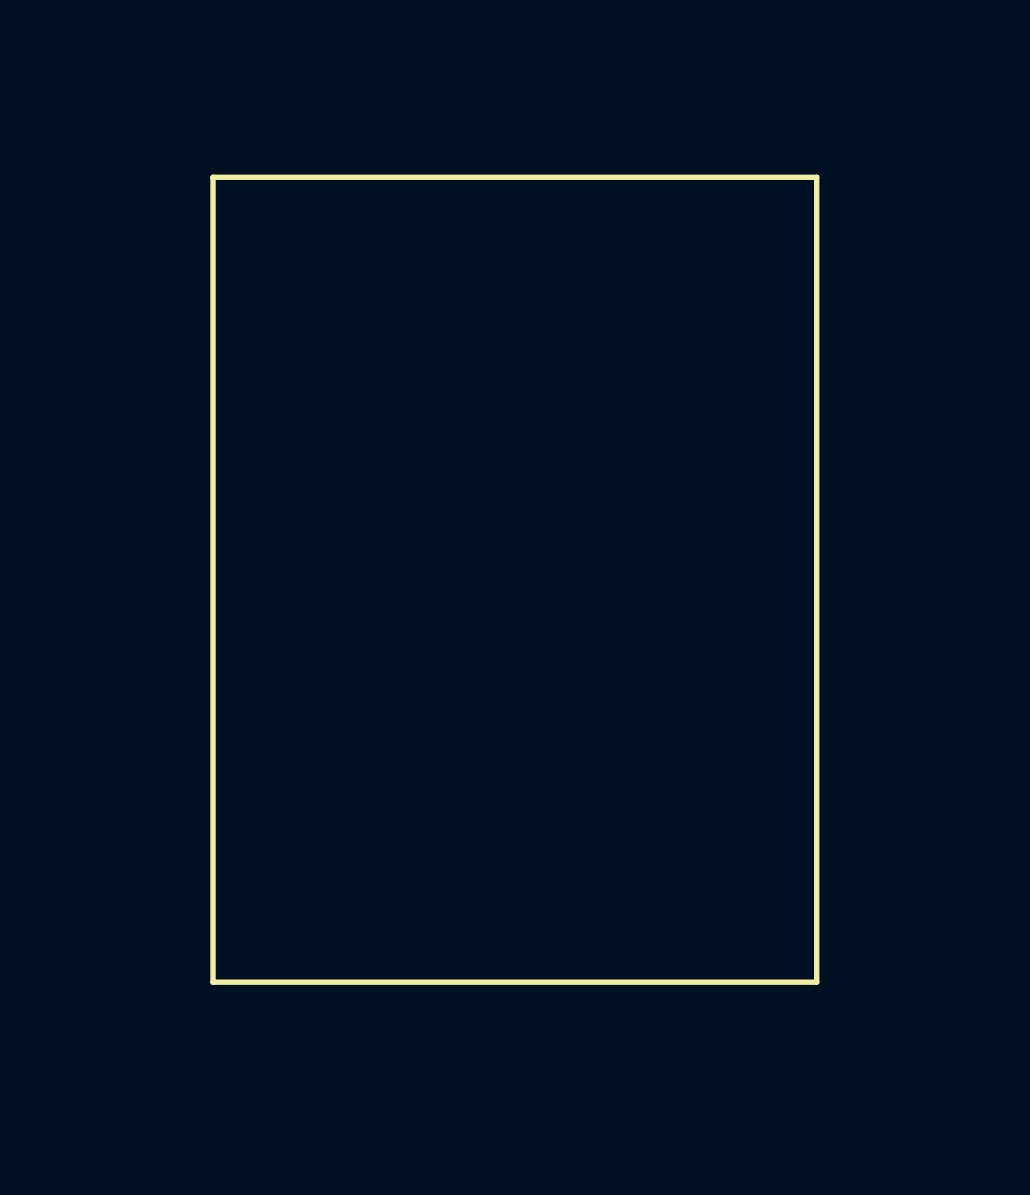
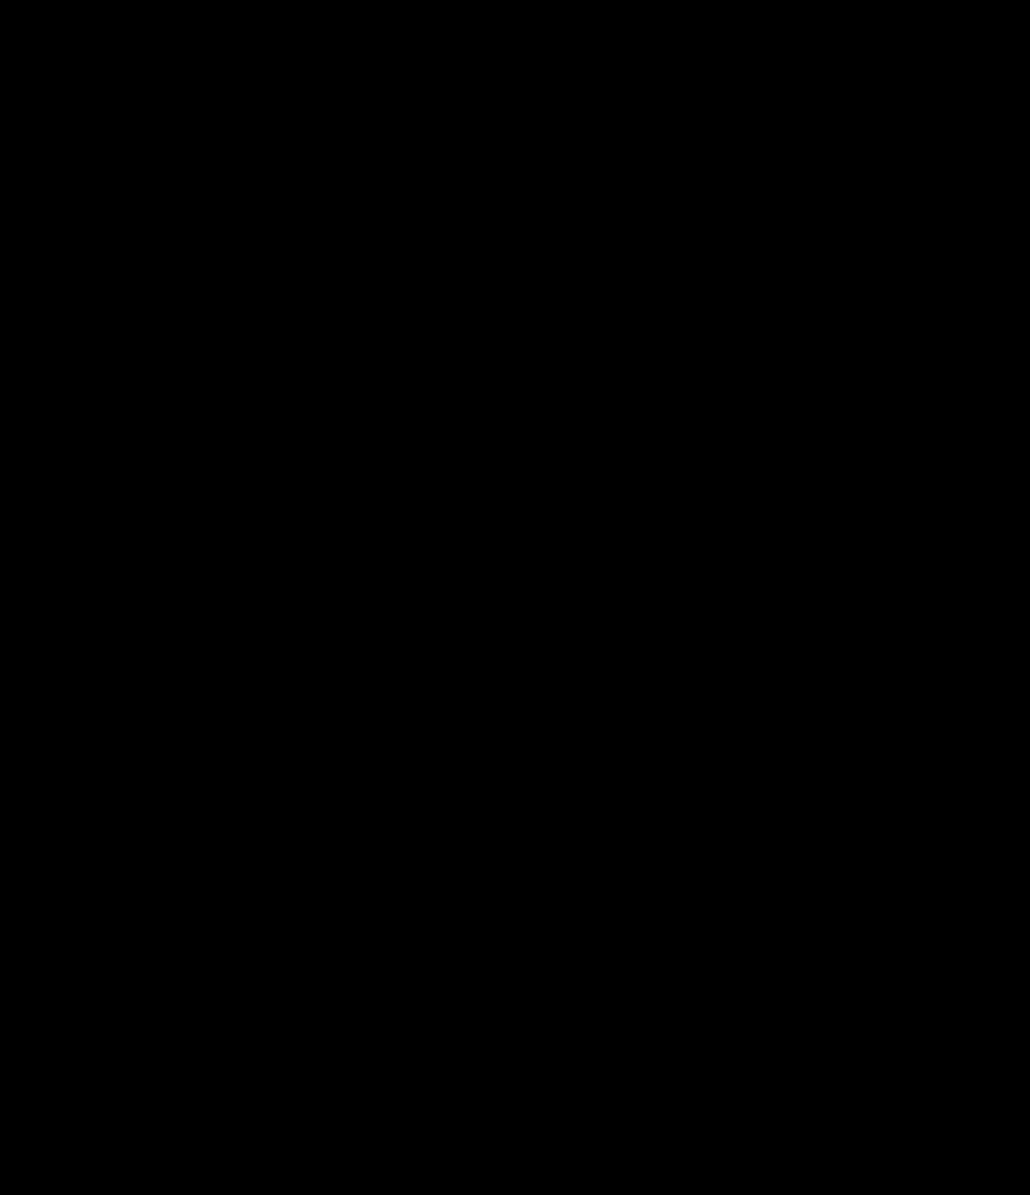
line: (213, 177) (816, 177) (816, 982) (213, 982) (213, 177) -> none

